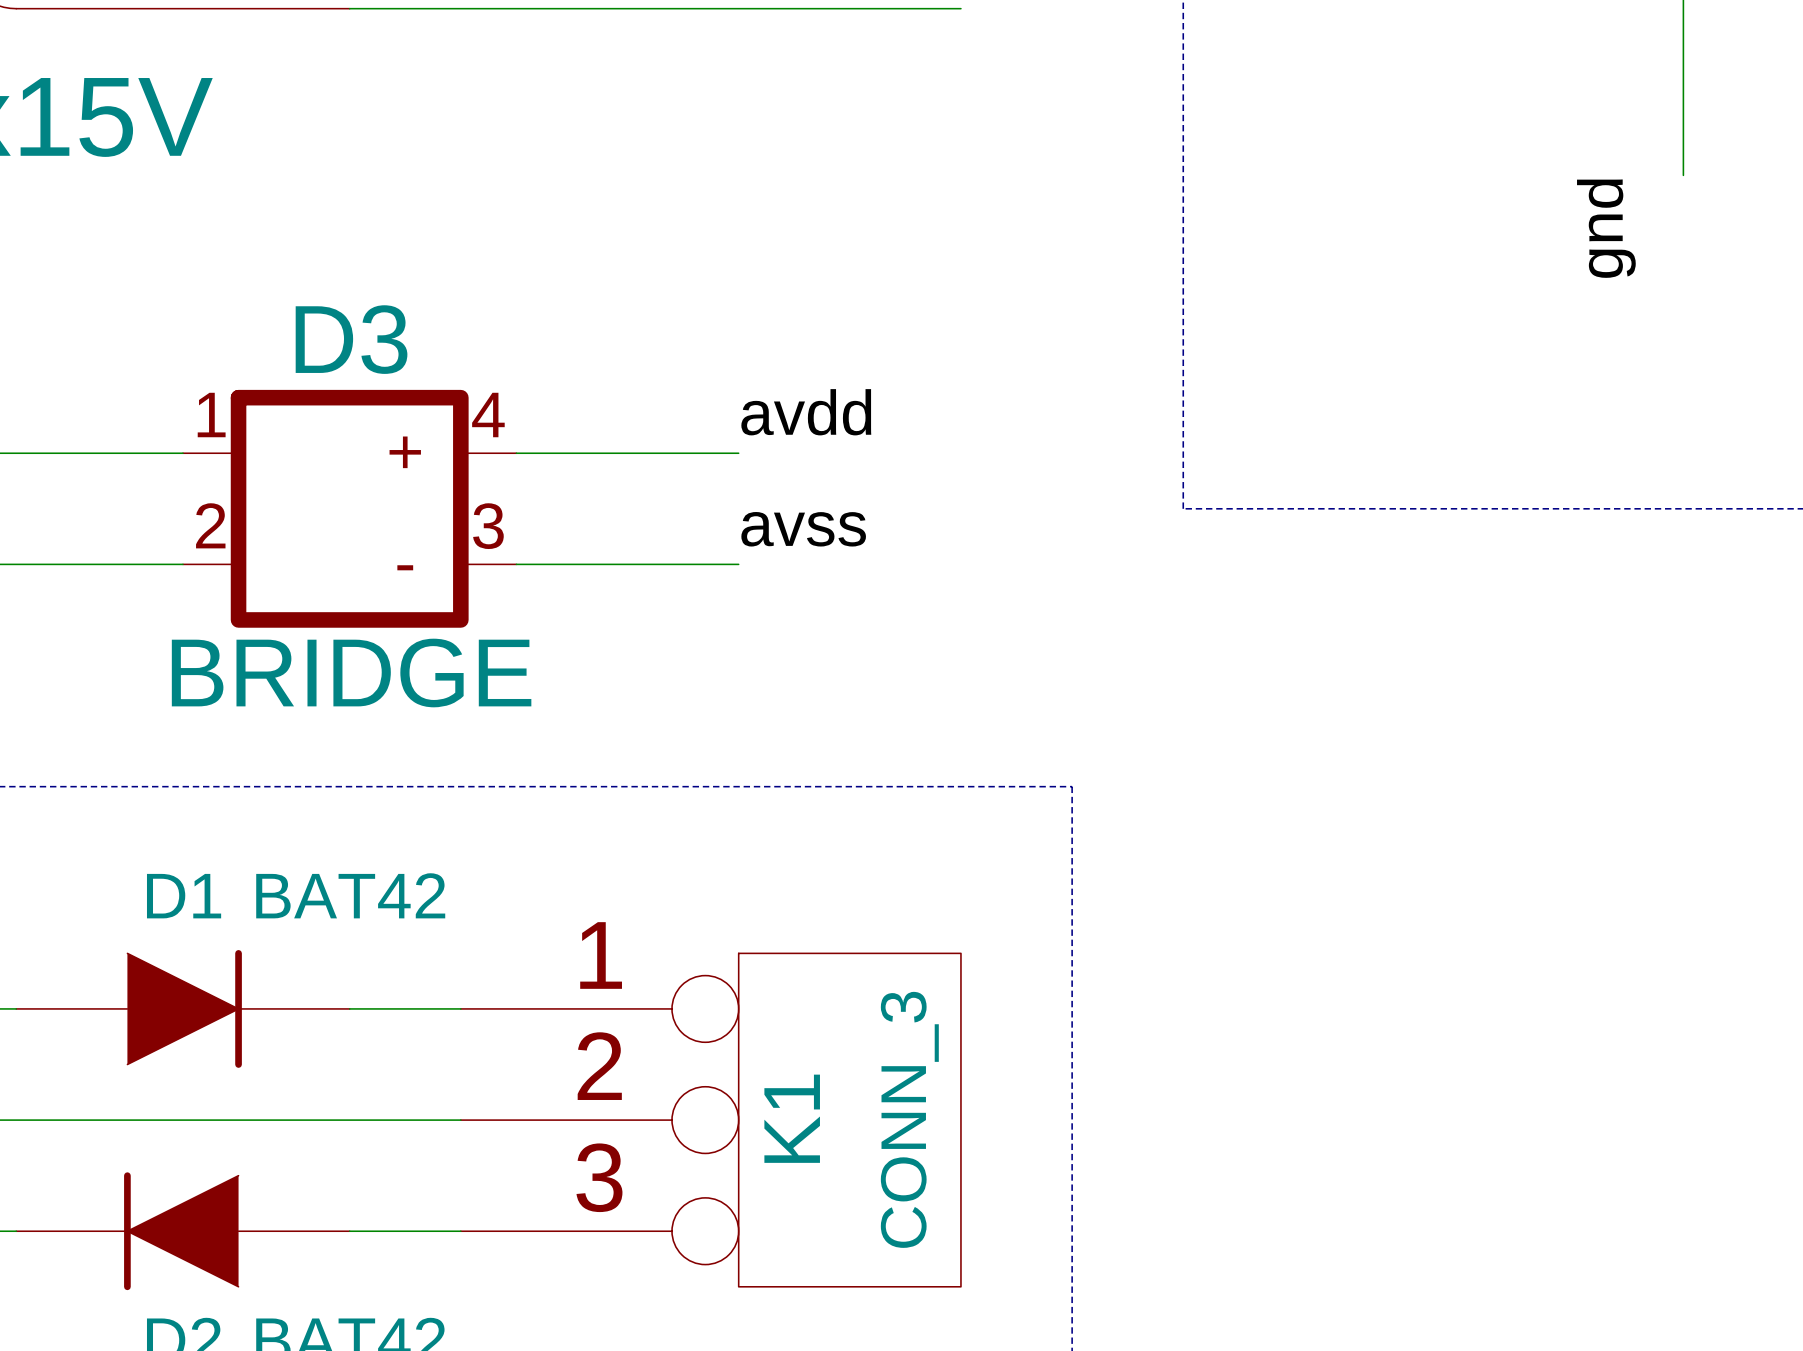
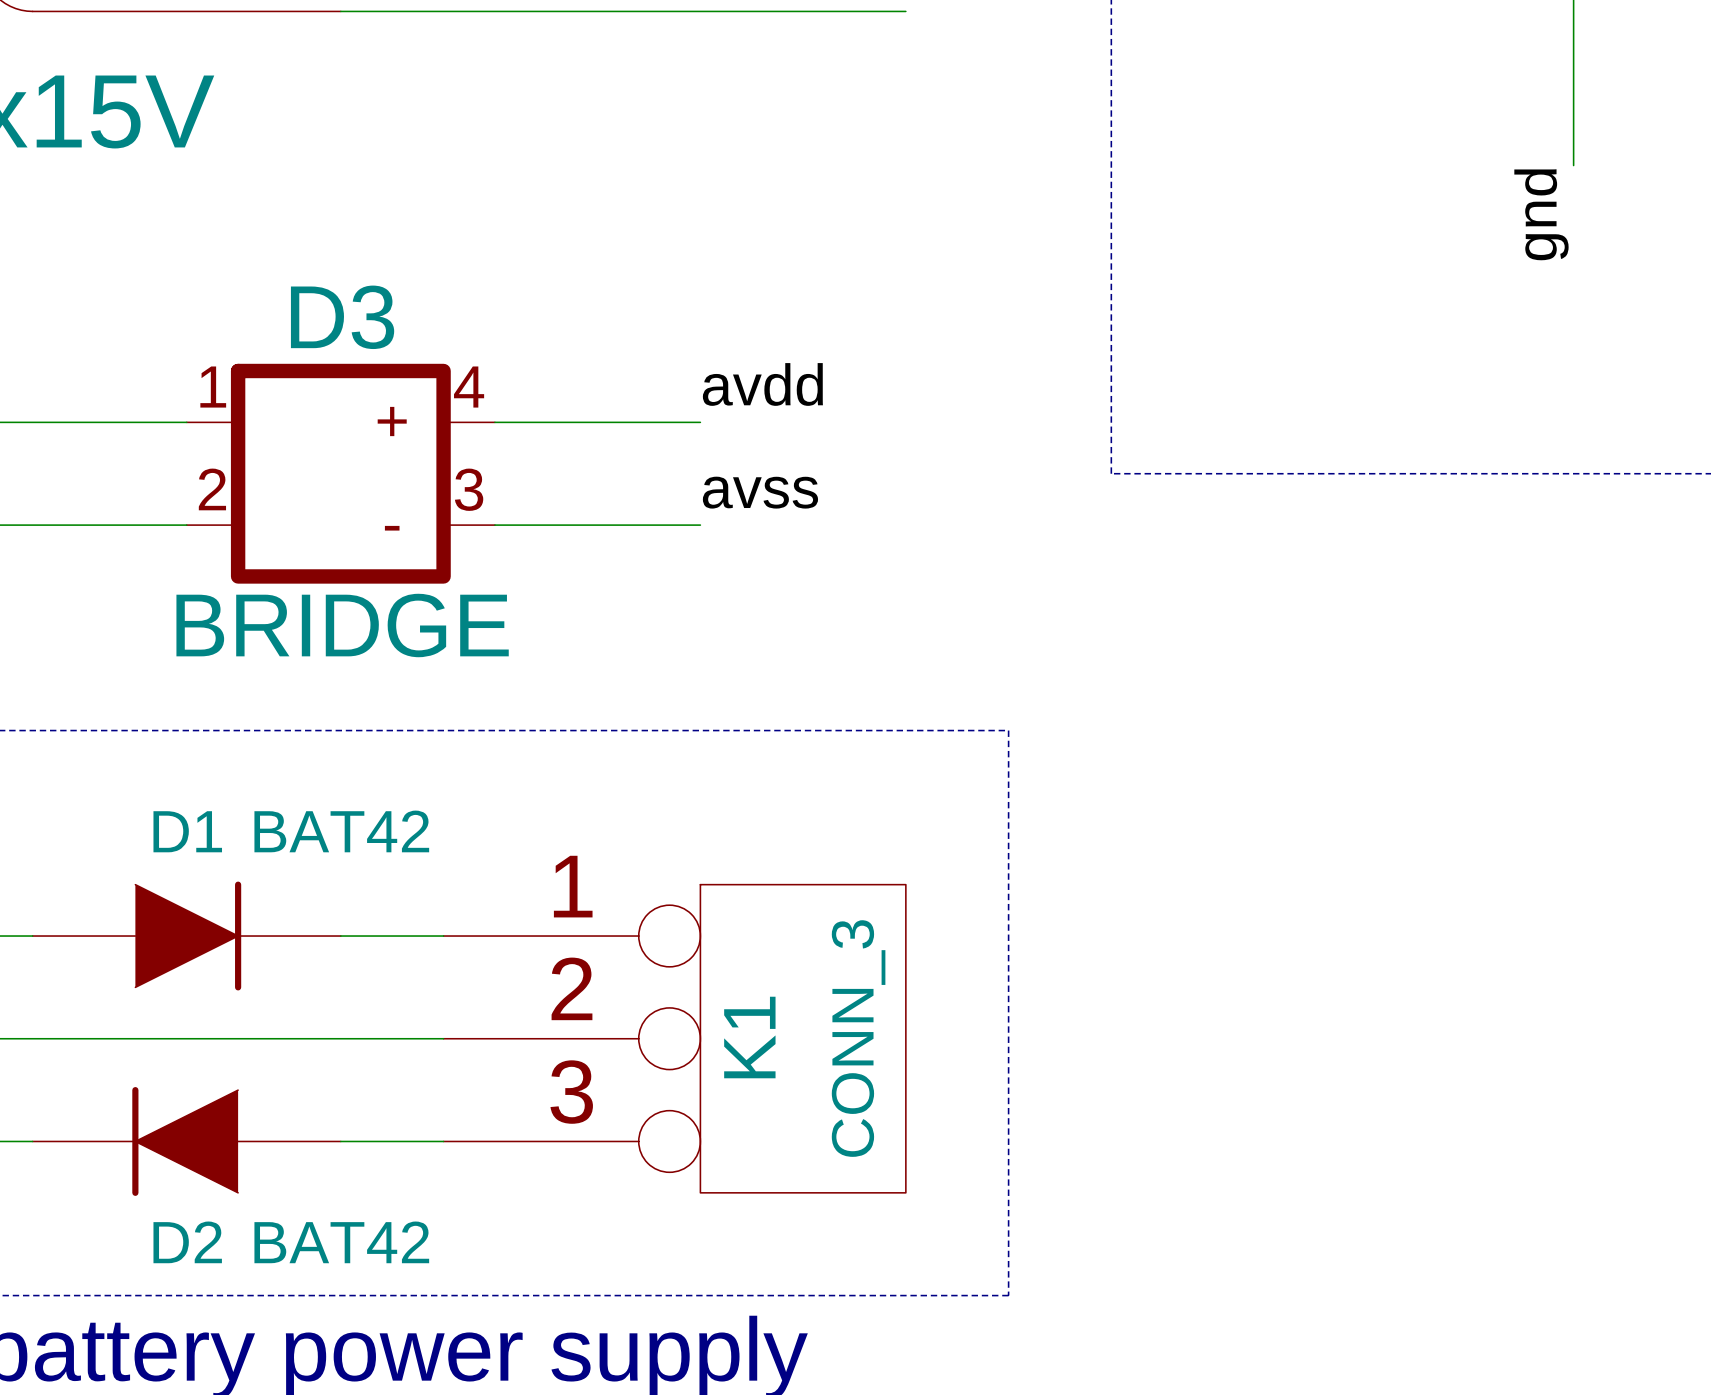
label position: gnd (1606, 228) -> gnd (1541, 214)

